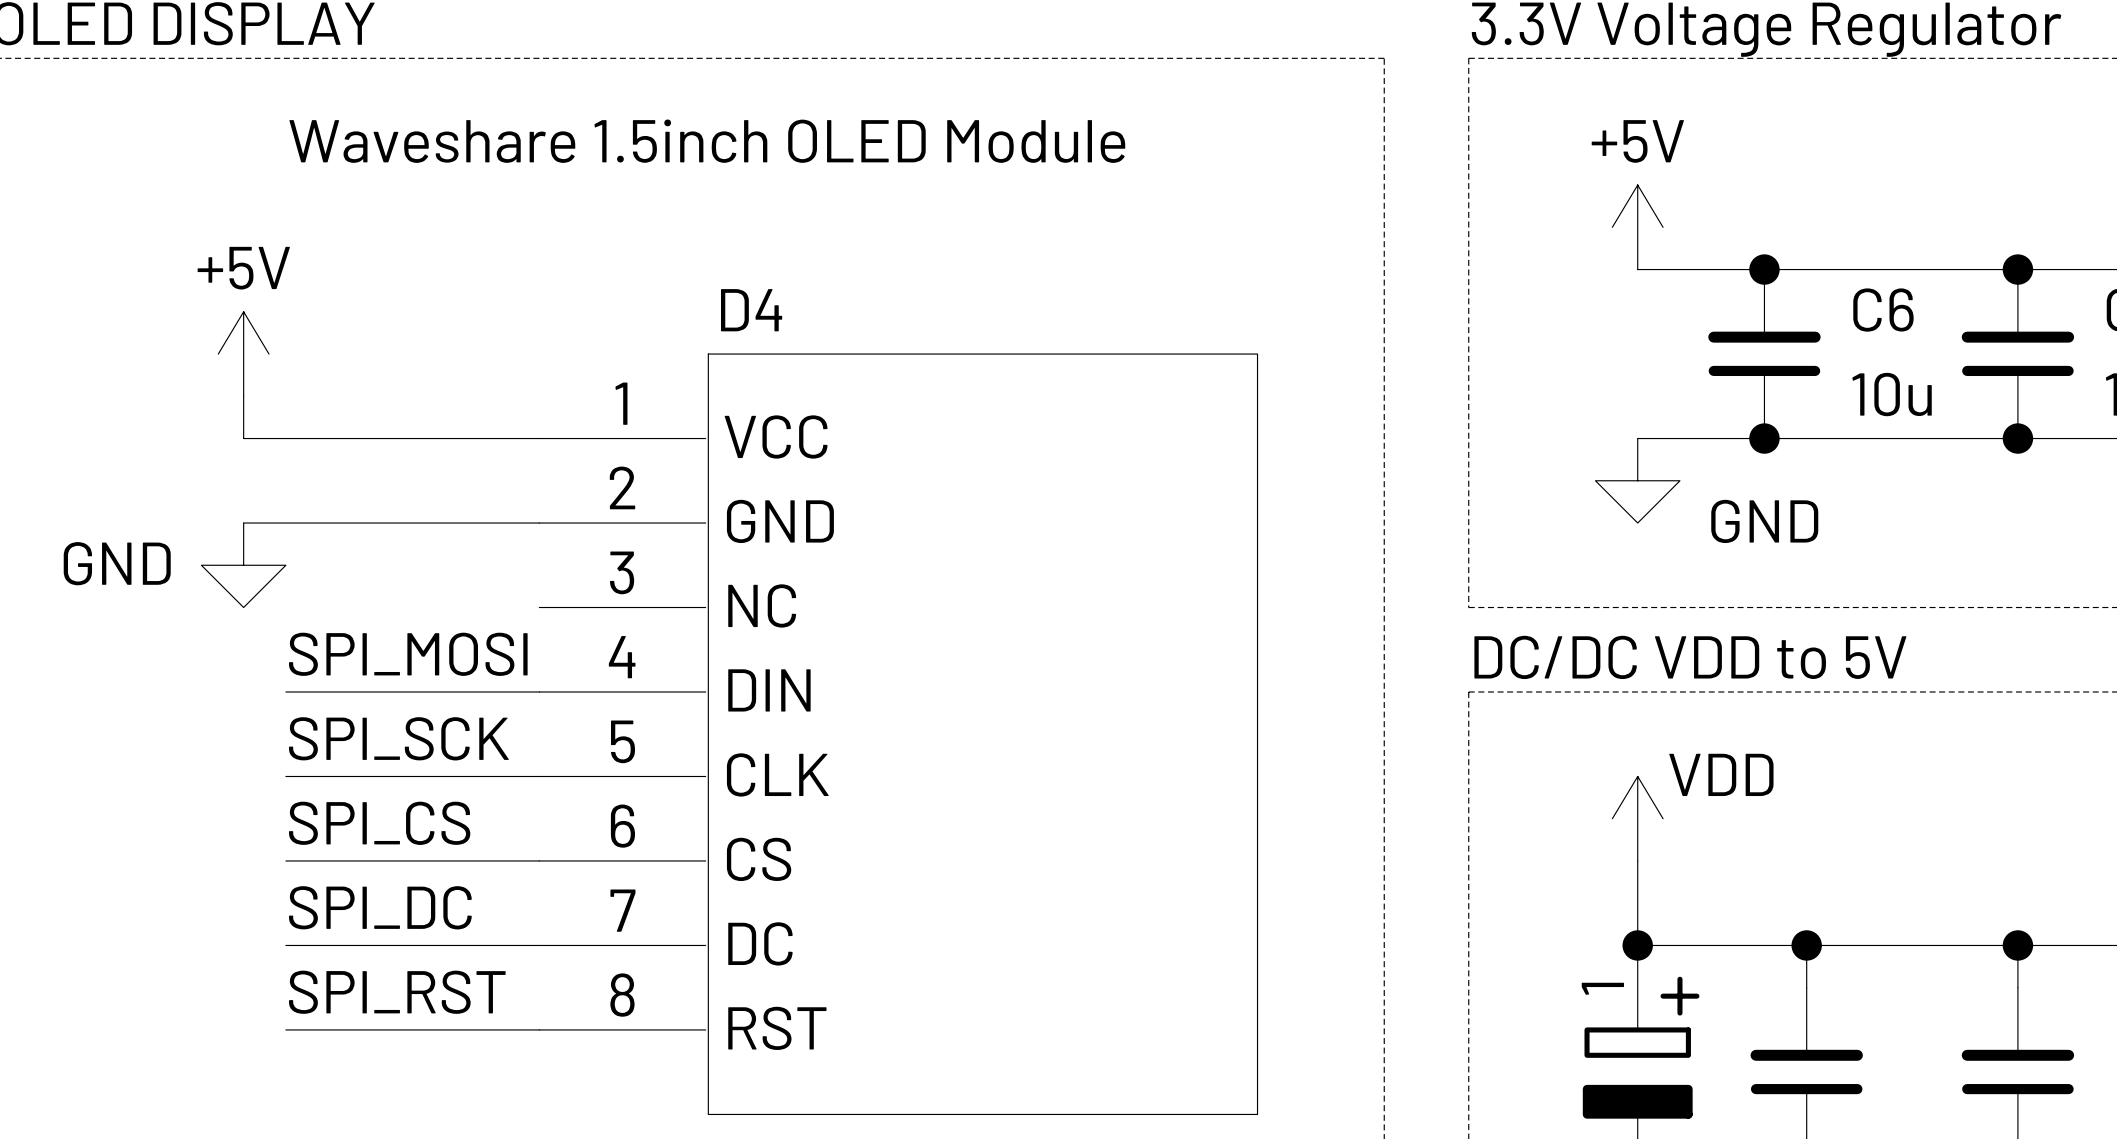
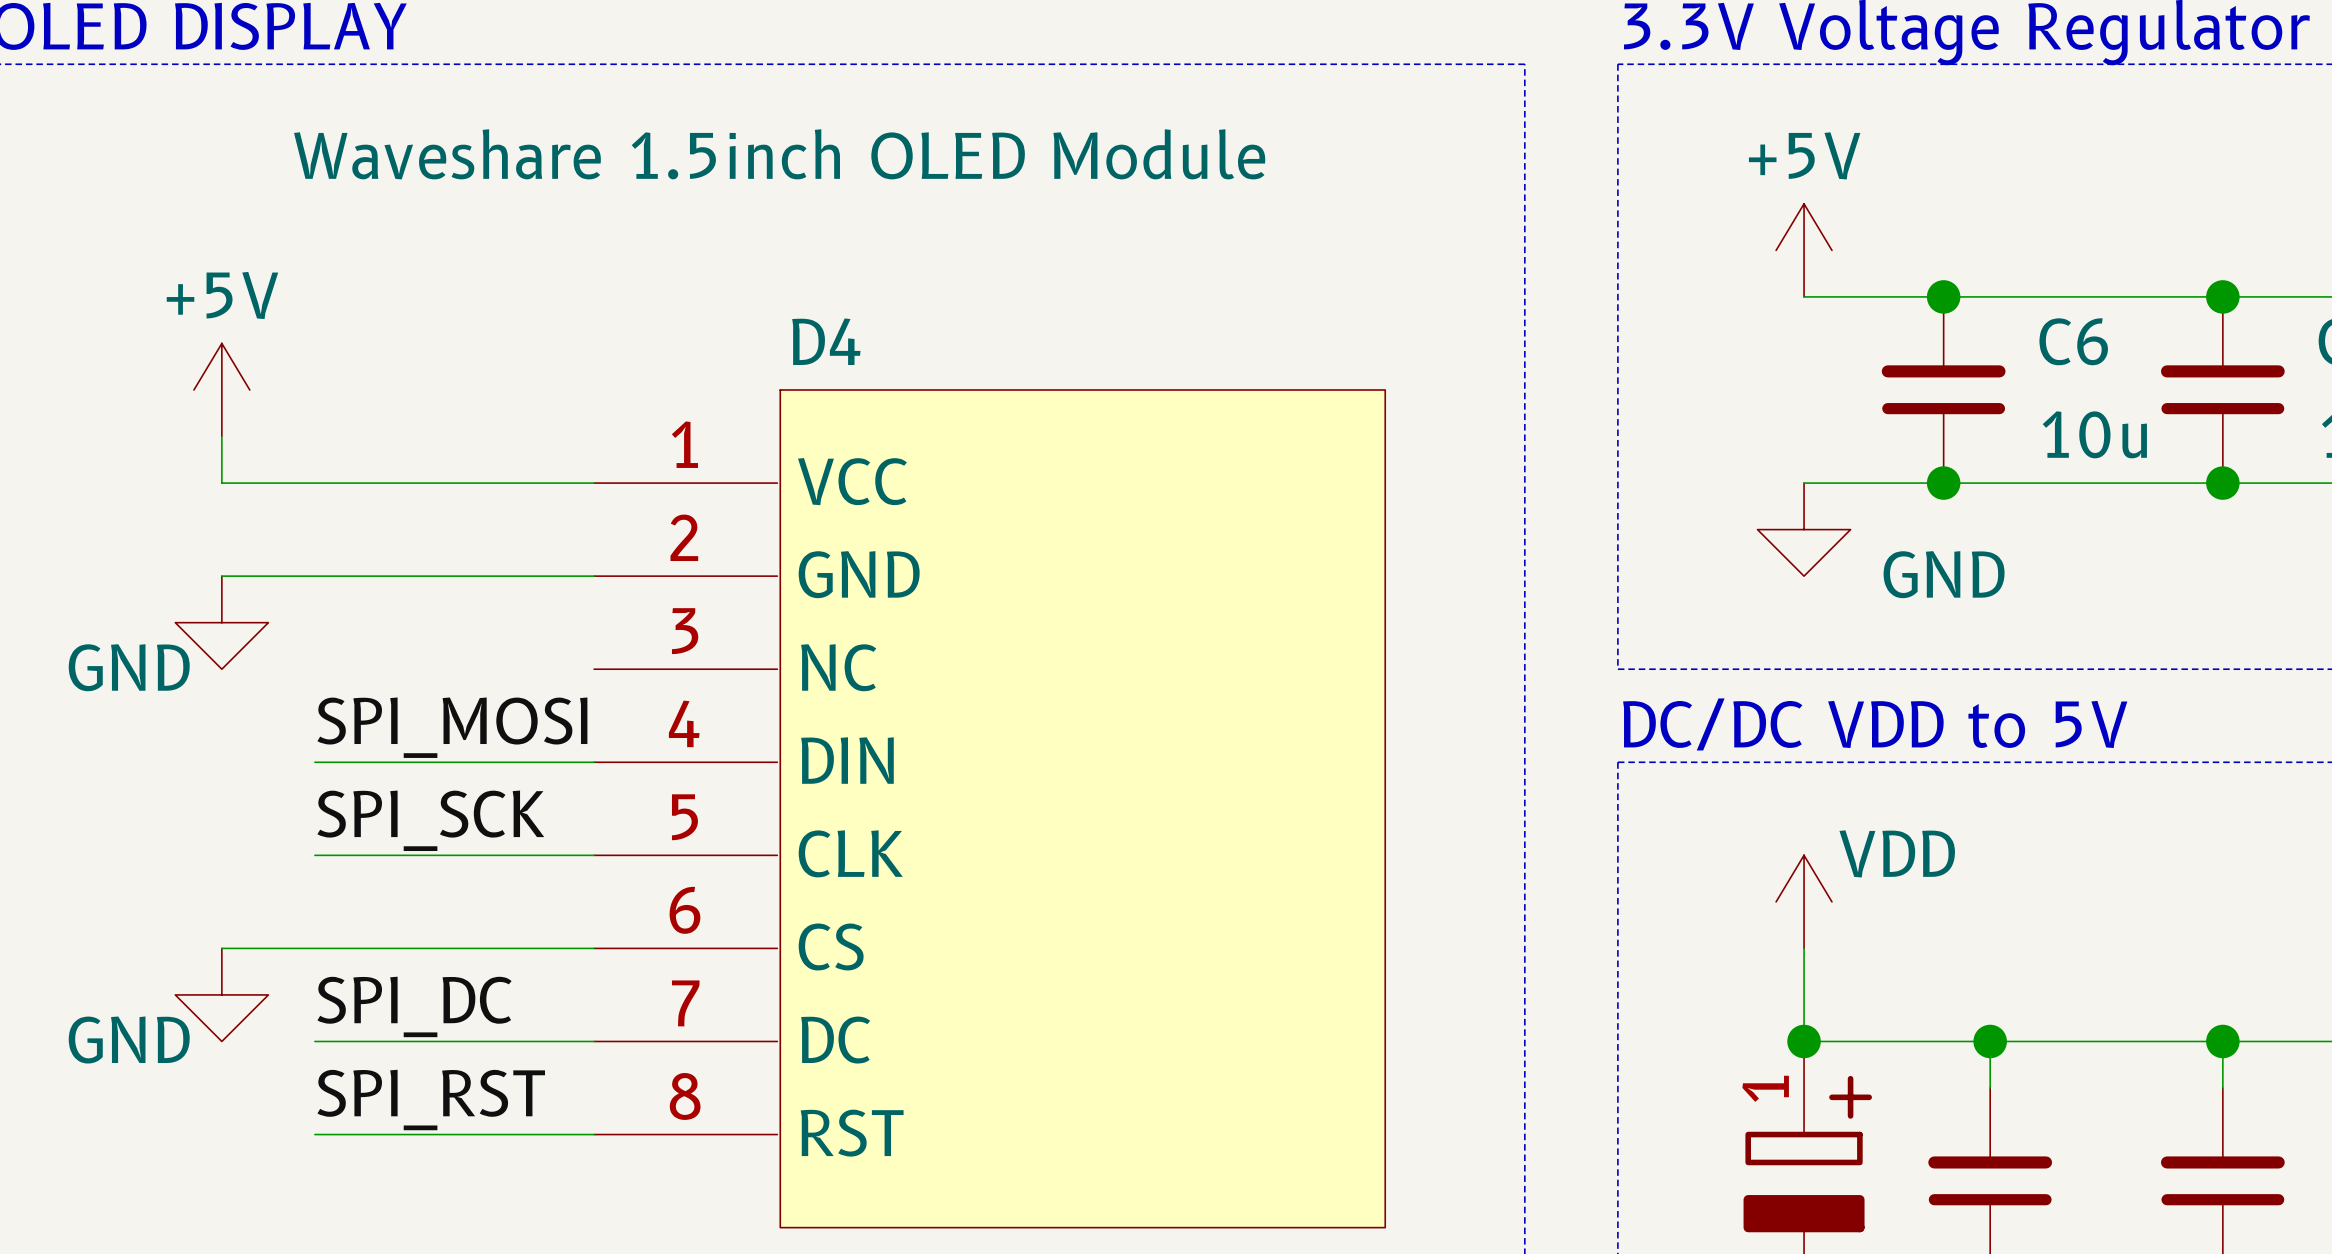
power symbol position: +5V (243, 354) -> +5V (221, 390)
wire: (243, 396) (243, 438) -> (221, 436) (221, 483) (268, 483)
wire: none -> (221, 576) (268, 576)
power symbol text position: GND (117, 563) -> GND (129, 667)
power symbol position: GND (243, 565) -> GND (221, 622)
label: SPI_CS (379, 823) -> none
wire: none -> (221, 948) (314, 948)
power symbol: none -> GND (221, 994)

